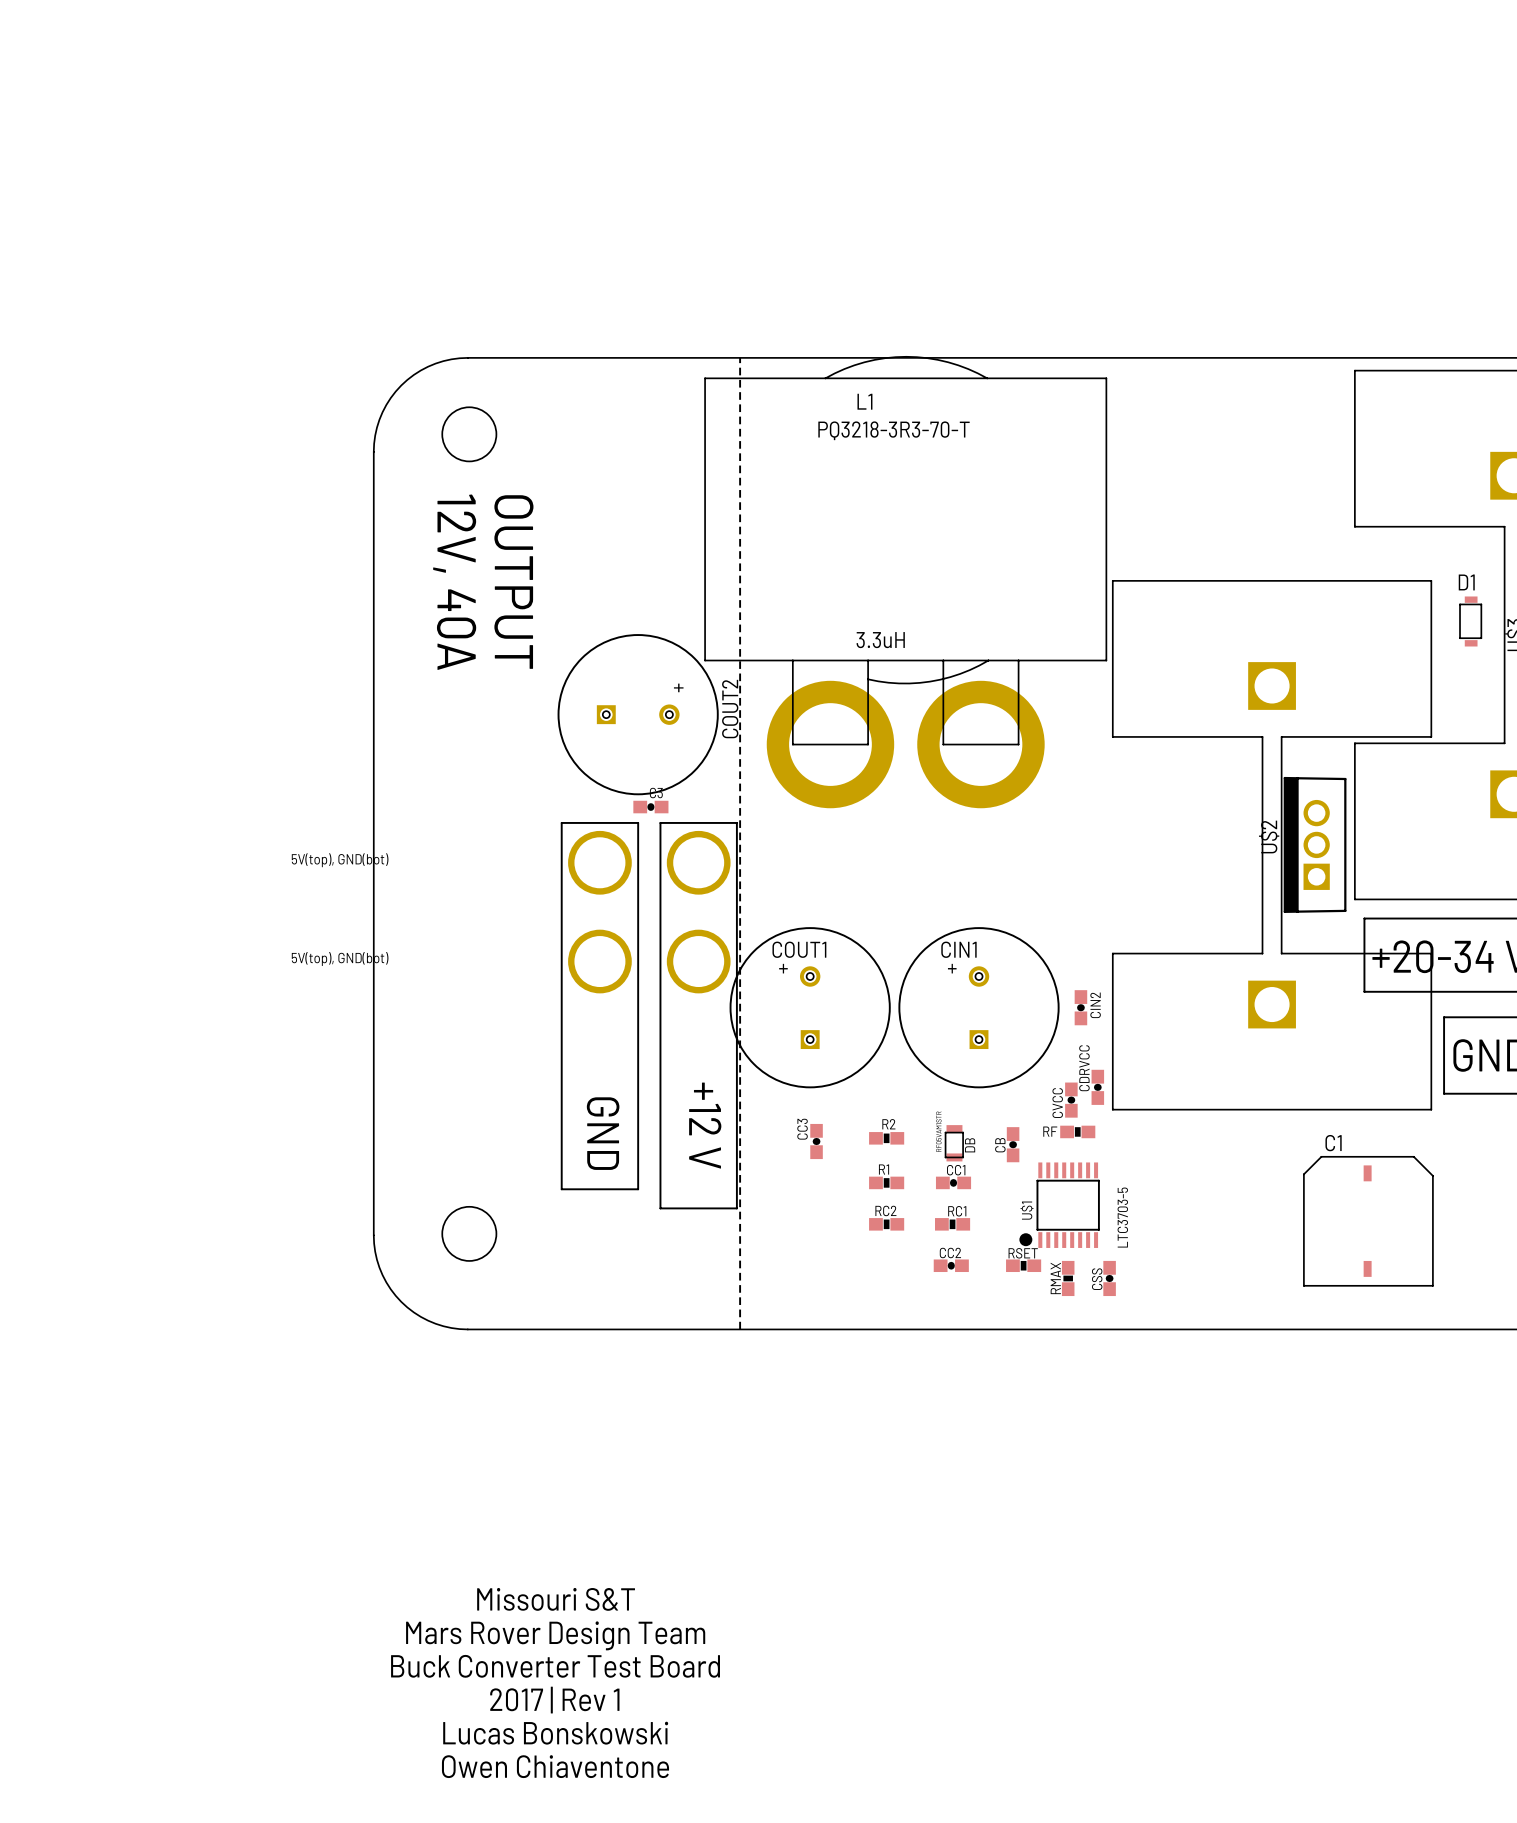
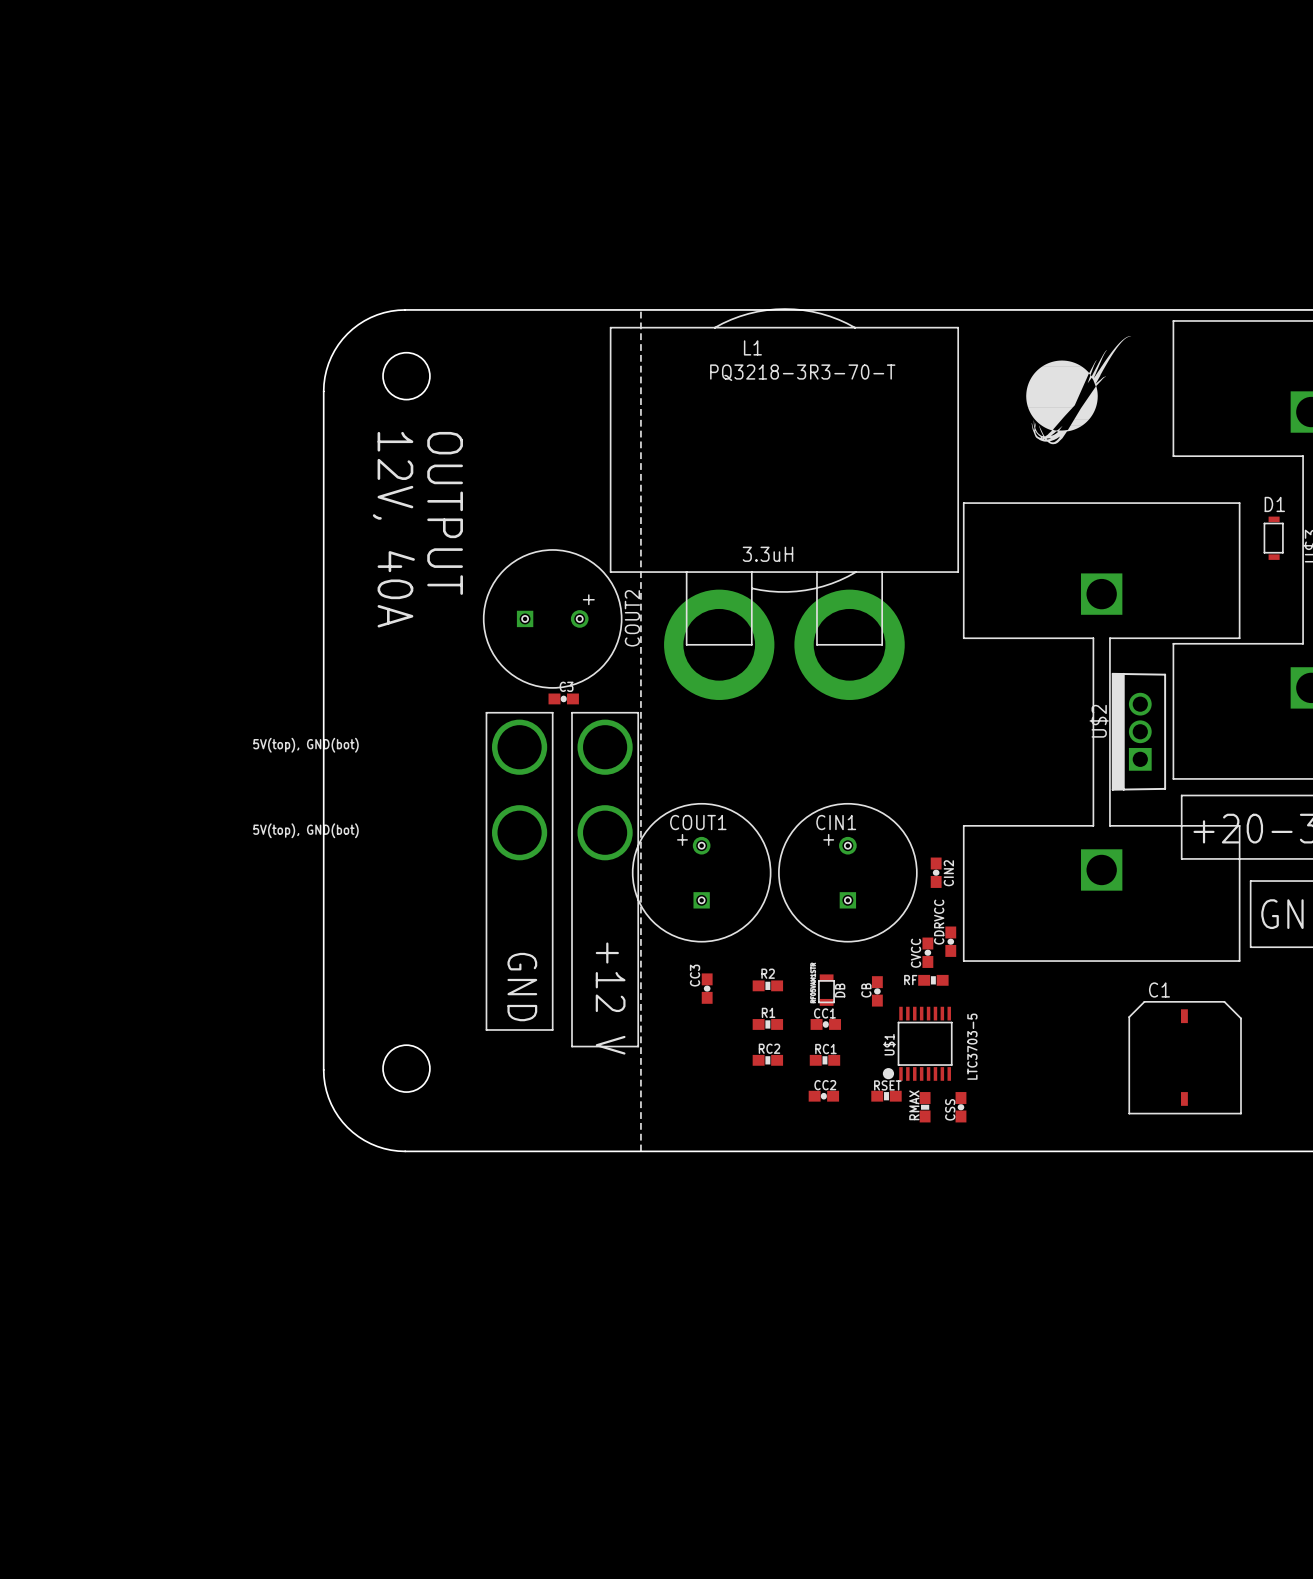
drawing: none -> [1026, 336, 1132, 445]
text: Missouri S&T (556, 1599) -> none
text: Mars Rover Design Team (555, 1635) -> none
text: Buck Converter Test Board (555, 1666) -> none
text: 2017 | Rev 1 (554, 1700) -> none
text: Lucas Bonskowski (555, 1733) -> none
text: Owen Chiaventone (555, 1766) -> none

